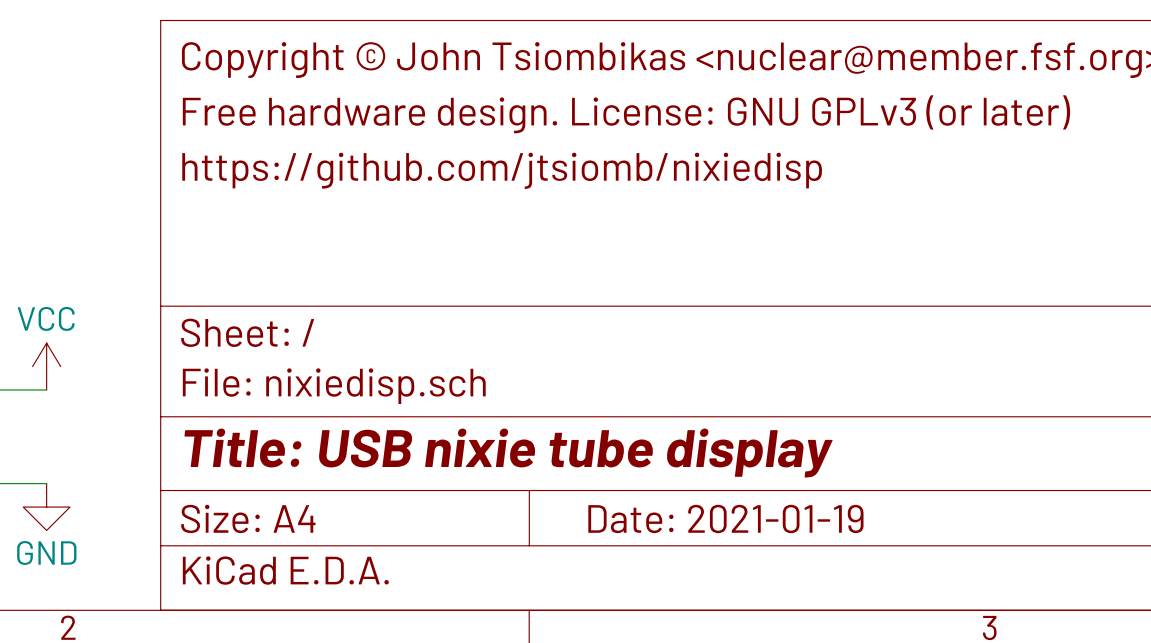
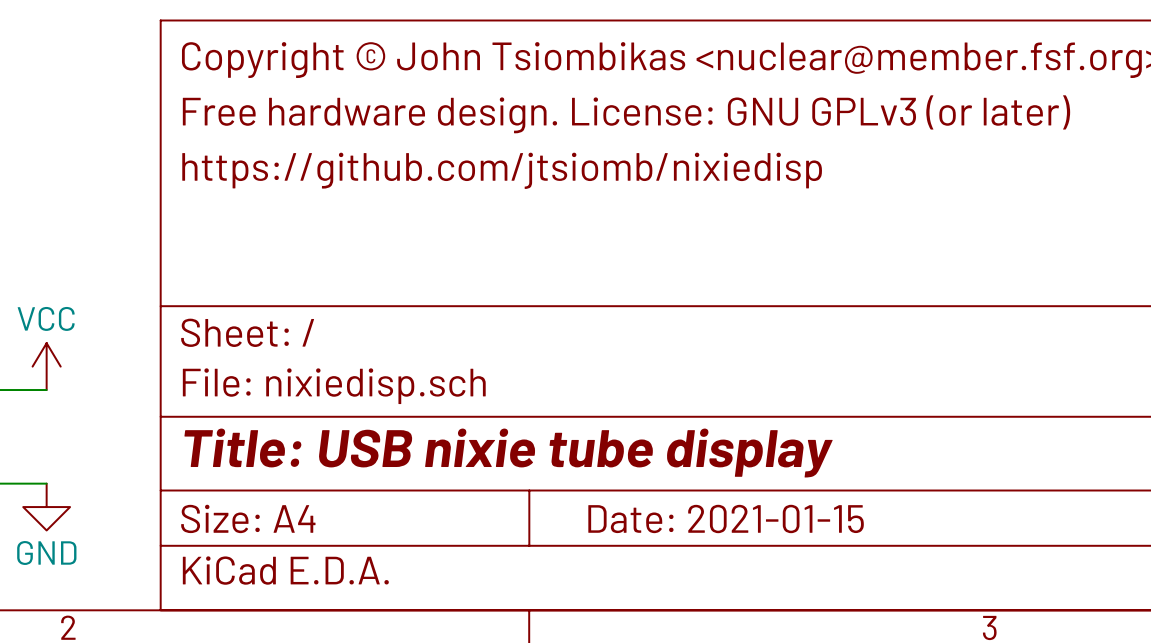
title block: Date: 2021-01-19 (725, 518) -> Date: 2021-01-15 (726, 518)

